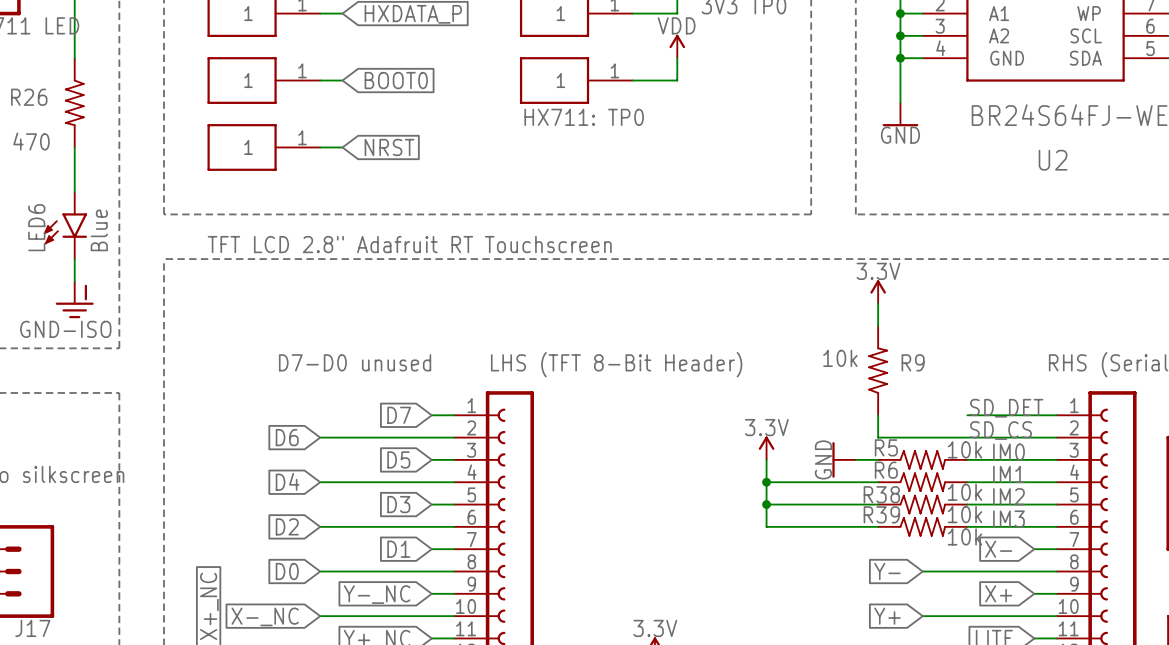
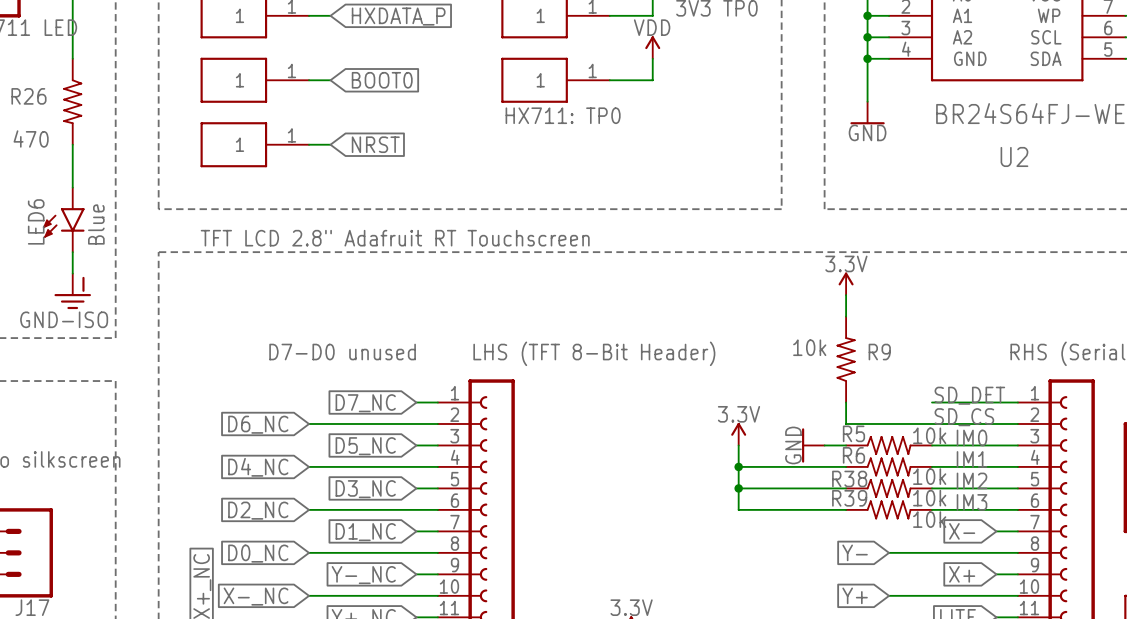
global label: D7 (399, 415) -> D7_NC (365, 403)
global label: D6 (287, 437) -> D6_NC (258, 424)
global label: D5 (398, 459) -> D5_NC (365, 446)
global label: D4 (287, 481) -> D4_NC (258, 467)
global label: D3 (398, 504) -> D3_NC (365, 489)
global label: D2 (287, 526) -> D2_NC (258, 510)
global label: D1 (398, 549) -> D1_NC (365, 532)
global label: D0 (287, 571) -> D0_NC (258, 553)

